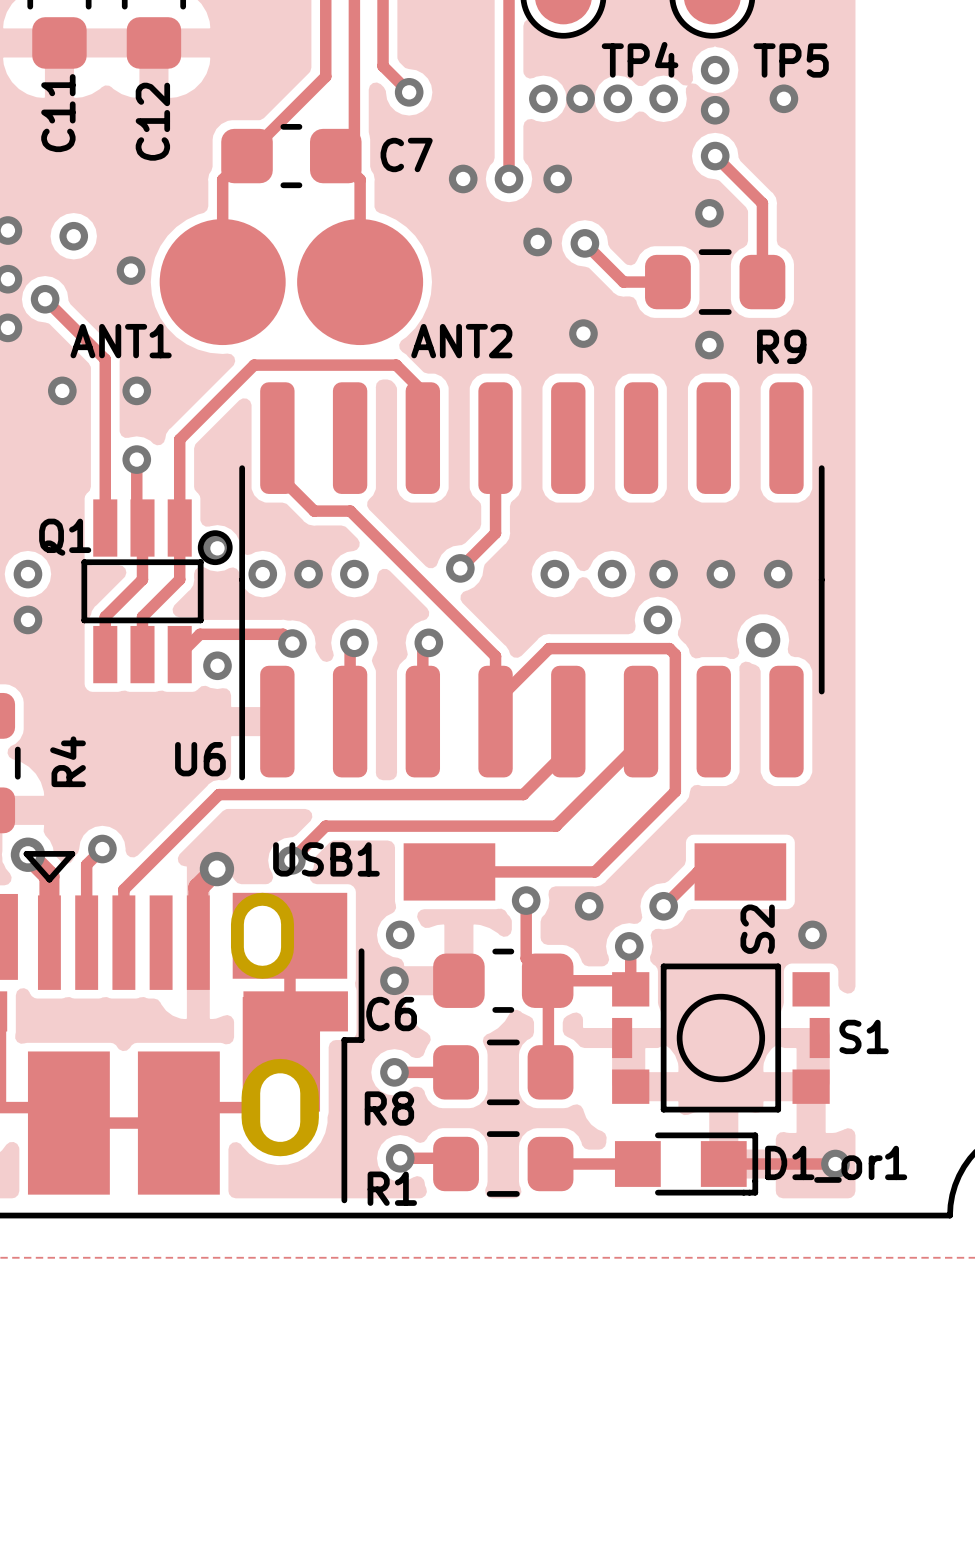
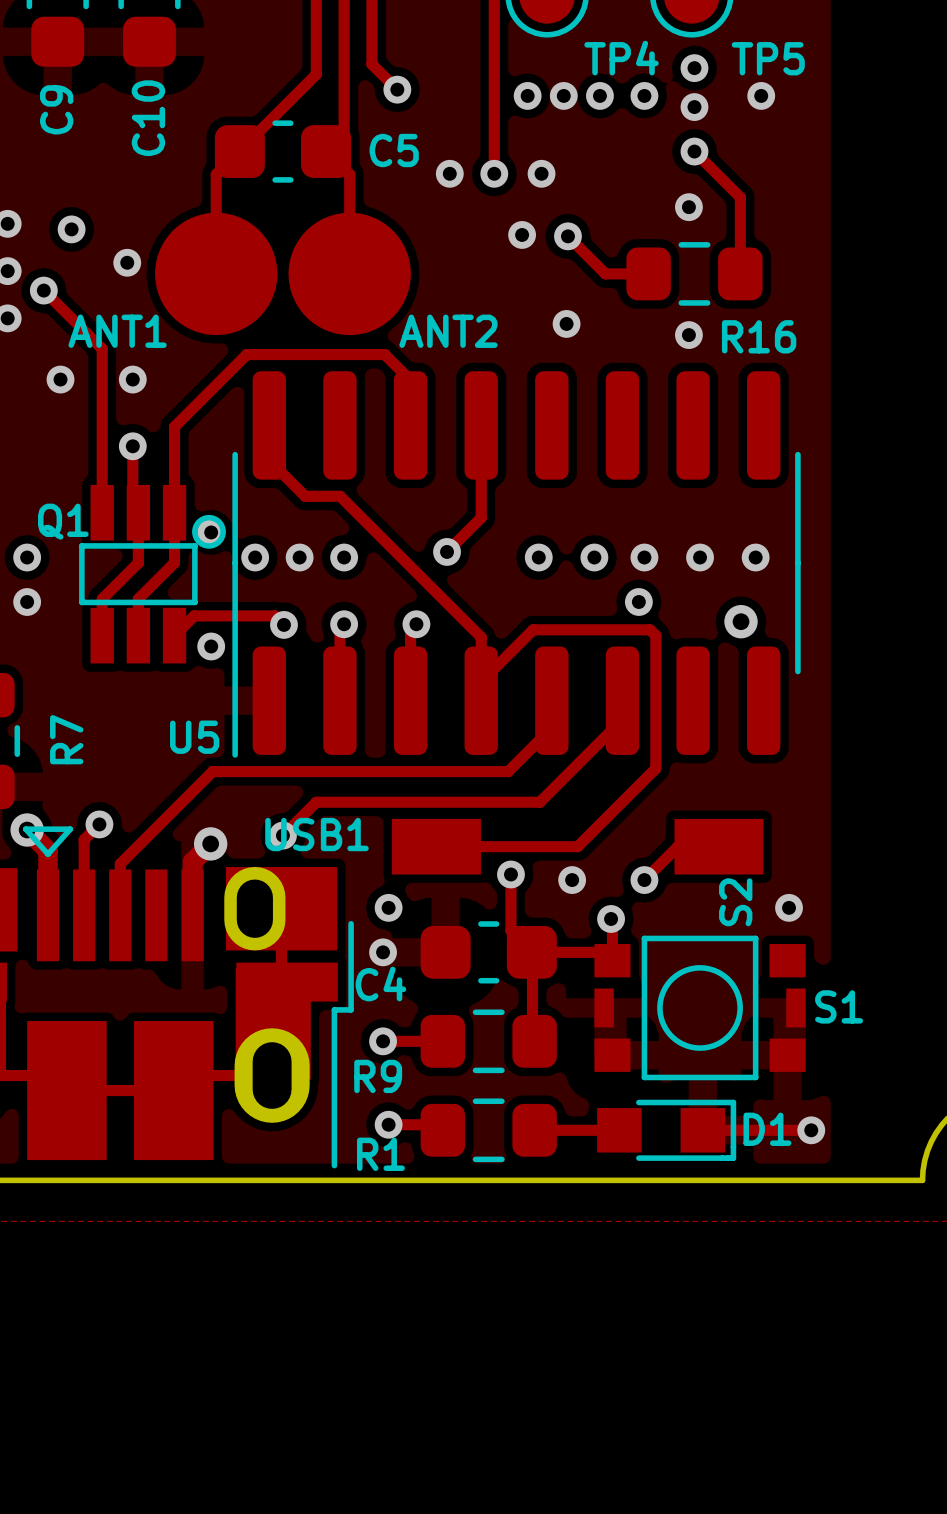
C11 name: C11 (58, 113) -> C9 (56, 109)
C12 name: C12 (152, 121) -> C10 (148, 118)
C7 name: C7 (406, 154) -> C5 (394, 150)
R9 name: R9 (781, 346) -> R16 (759, 336)
U6 name: U6 (200, 759) -> U5 (194, 737)
R4 name: R4 (68, 761) -> R7 (66, 739)
C6 name: C6 (391, 1014) -> C4 (380, 984)
R8 name: R8 (389, 1108) -> R9 (378, 1076)
D1_or1 name: D1_or1 (836, 1164) -> D1 (767, 1129)

